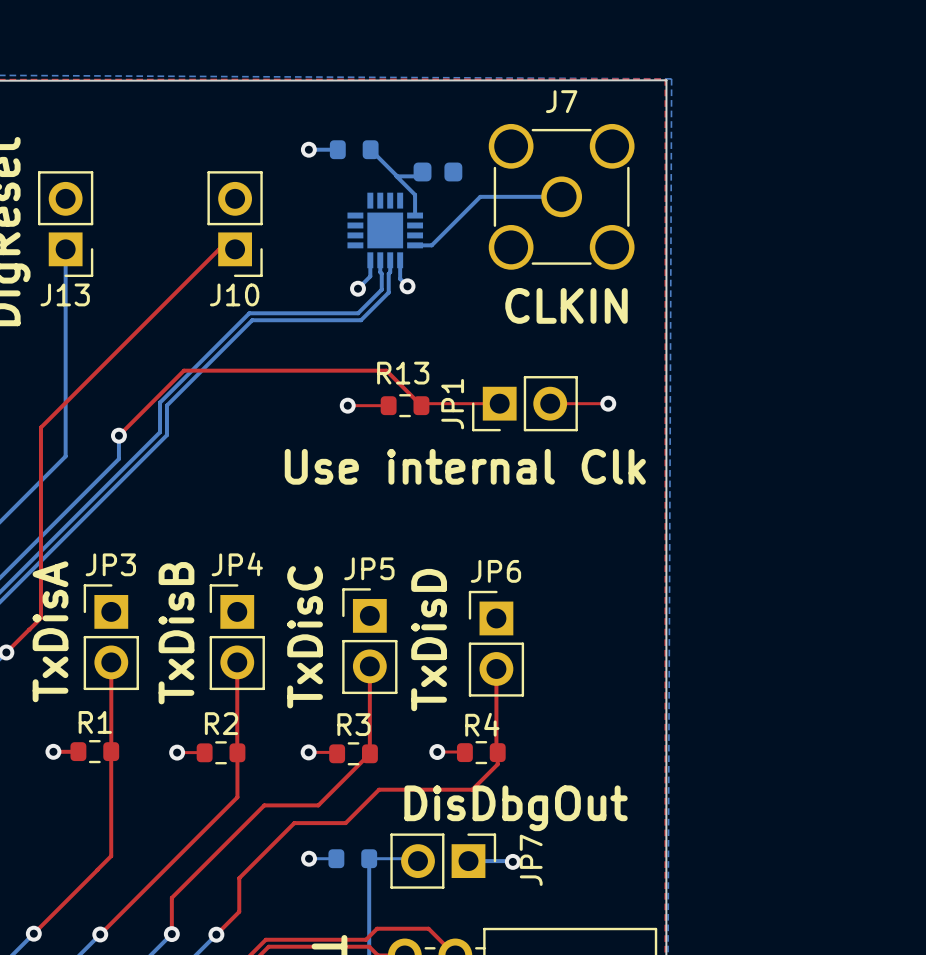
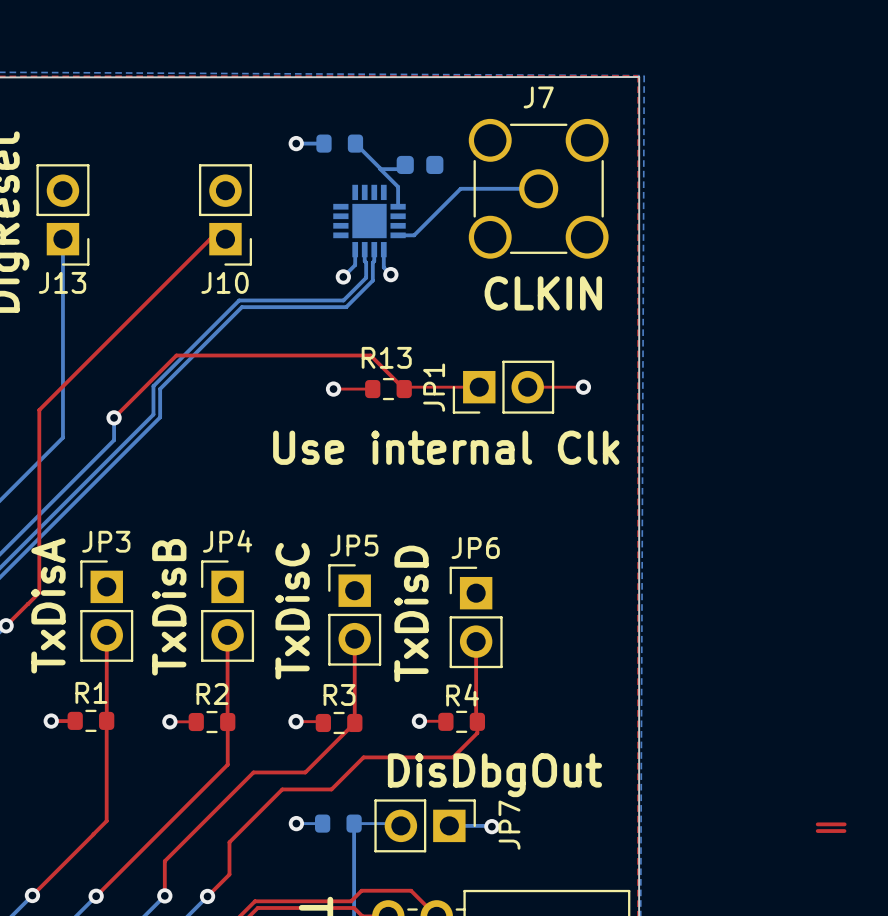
top track: none -> (817, 824) (844, 824)
top track: none -> (817, 831) (844, 831)

